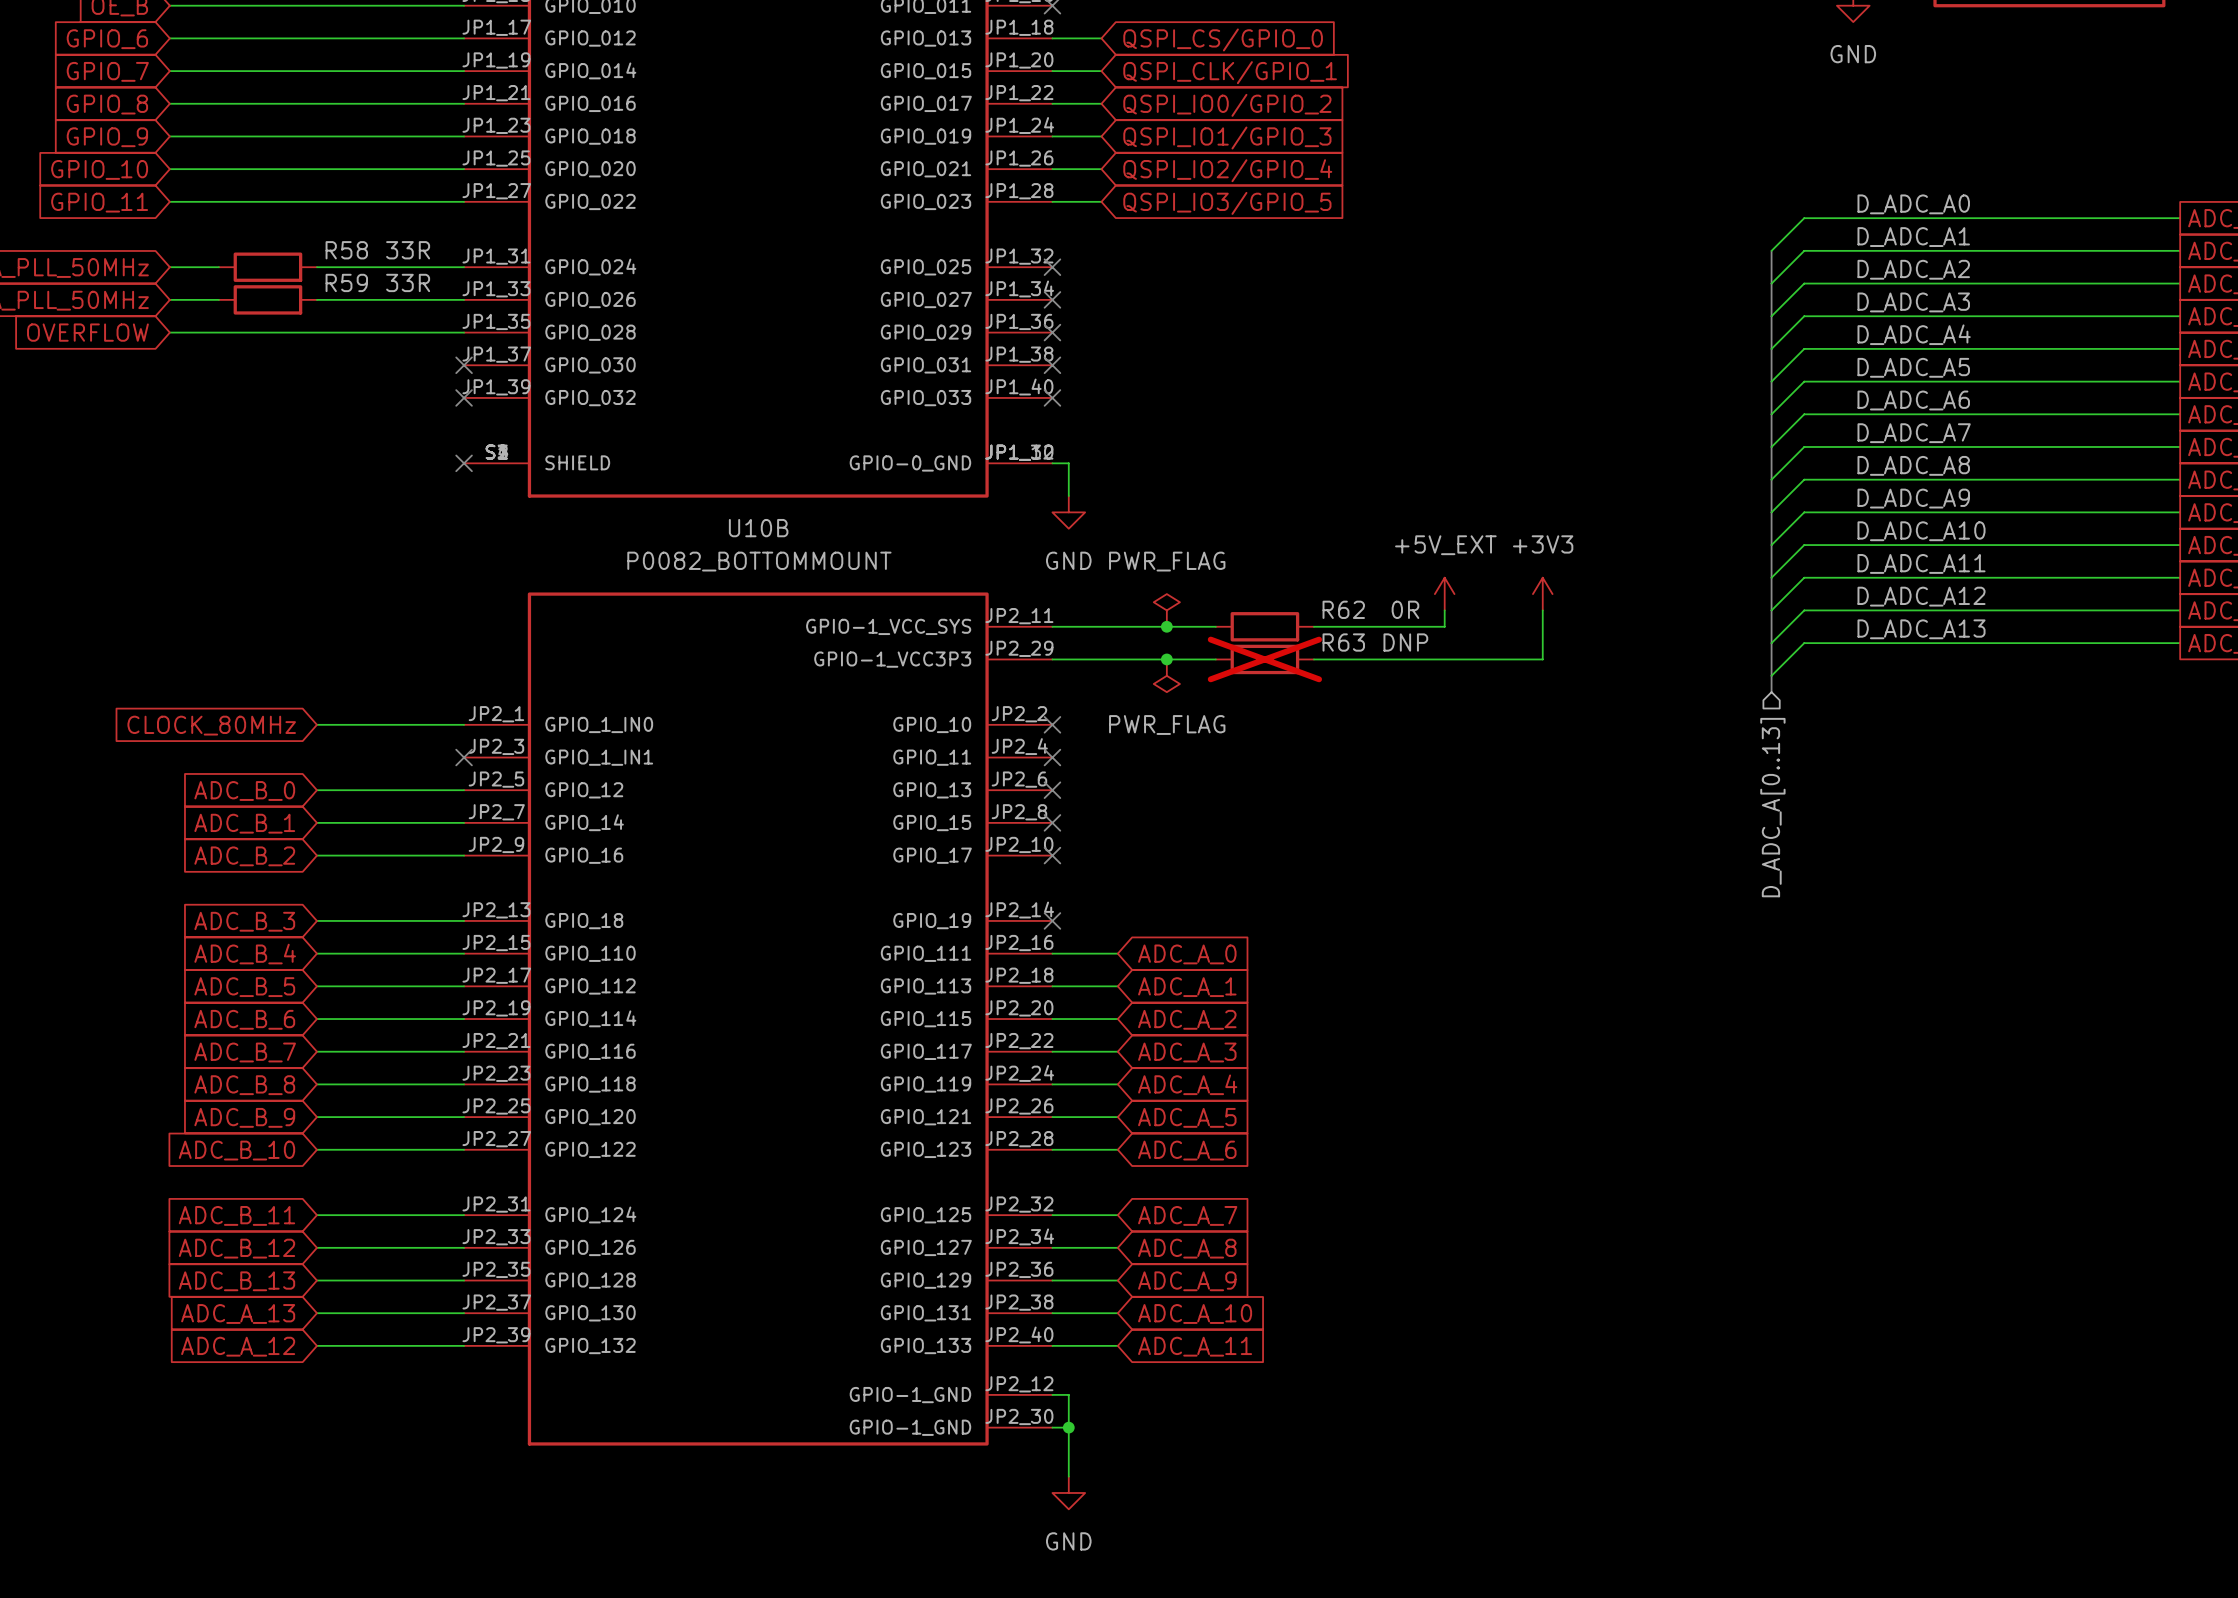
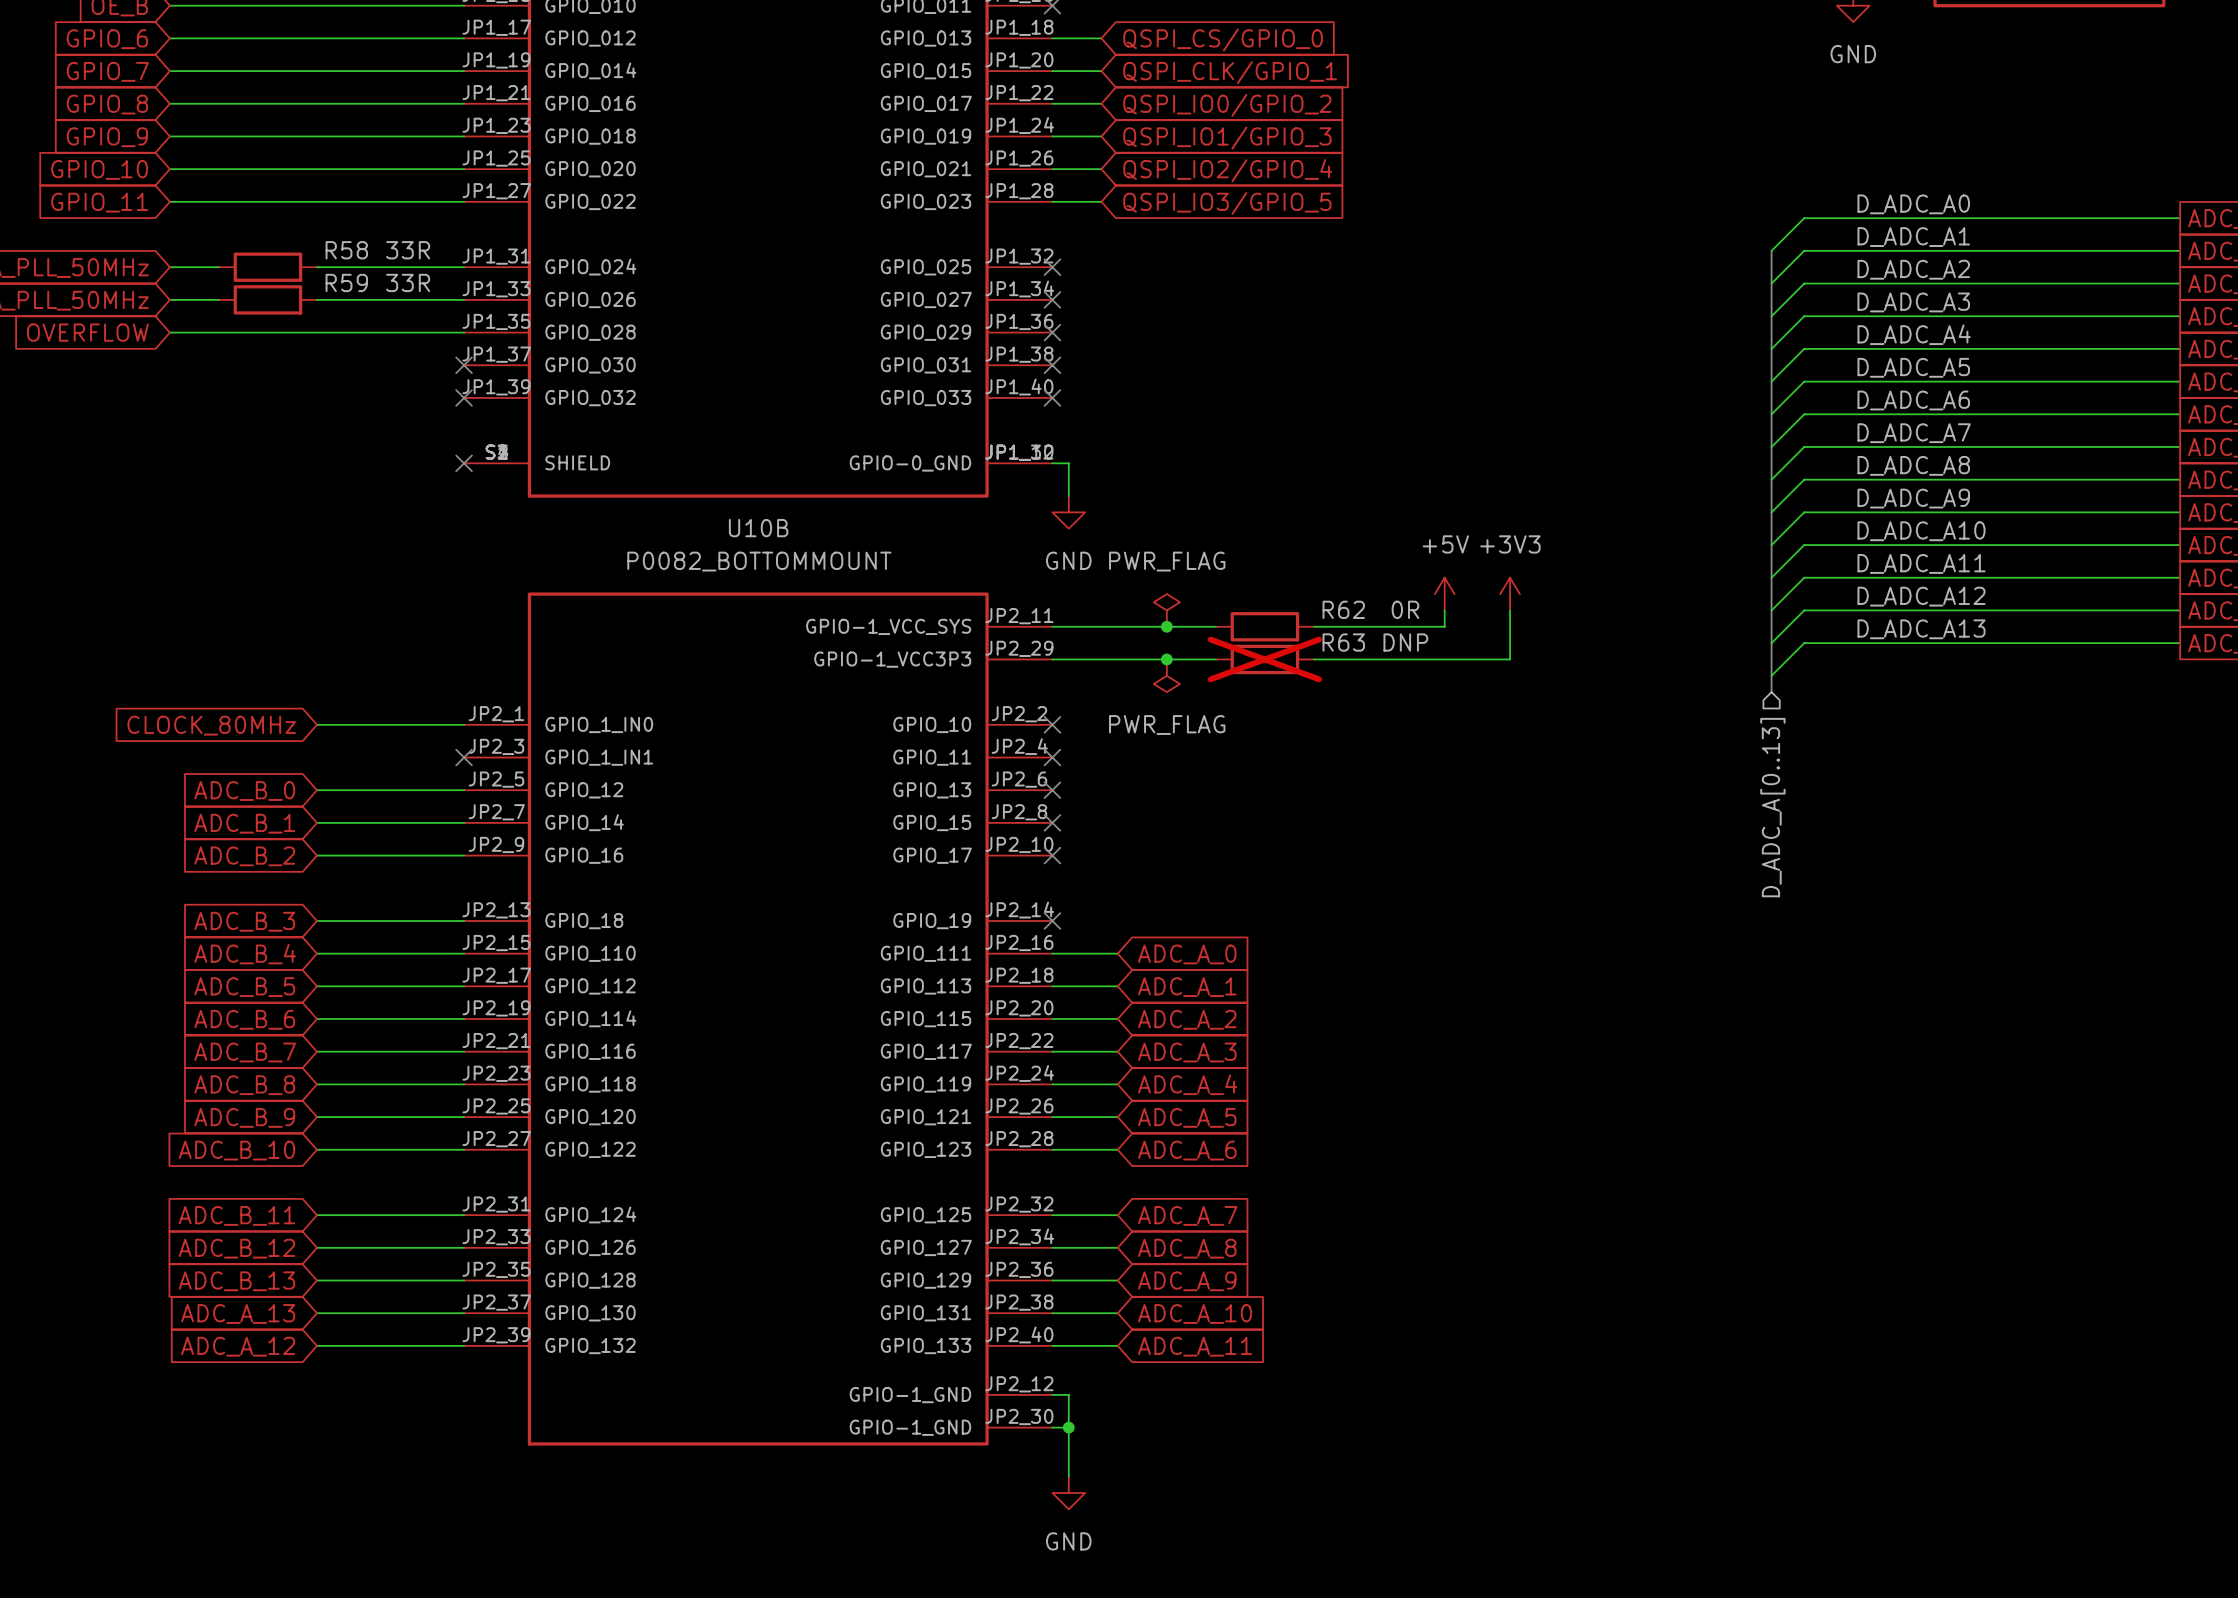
power symbol: +5V_EXT (1444, 594) -> +5V (1444, 594)
power symbol position: +3V3 (1542, 594) -> +3V3 (1510, 594)
wire: (1542, 610) (1542, 659) (1510, 659) -> (1510, 610) (1510, 659)

